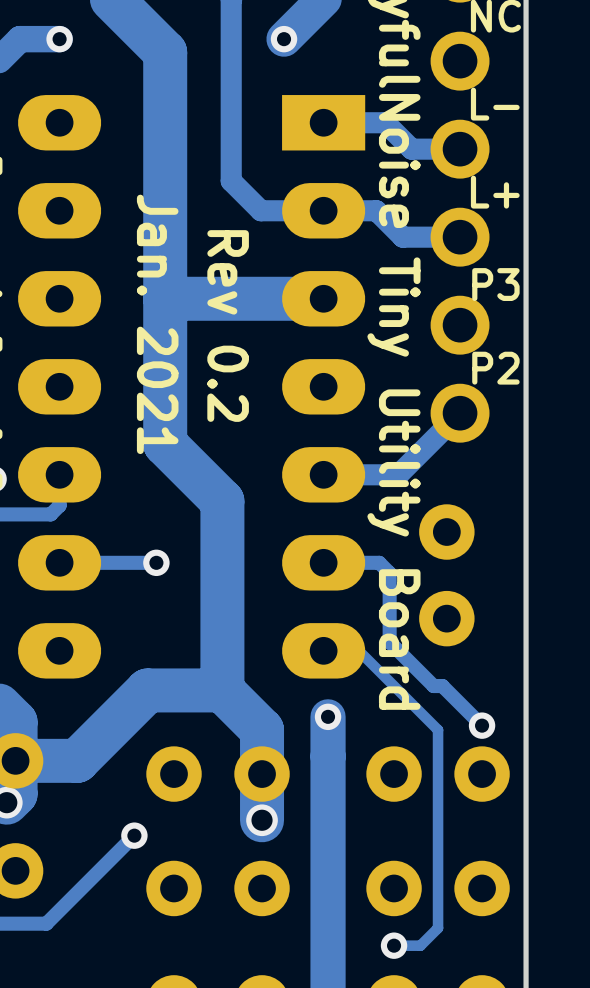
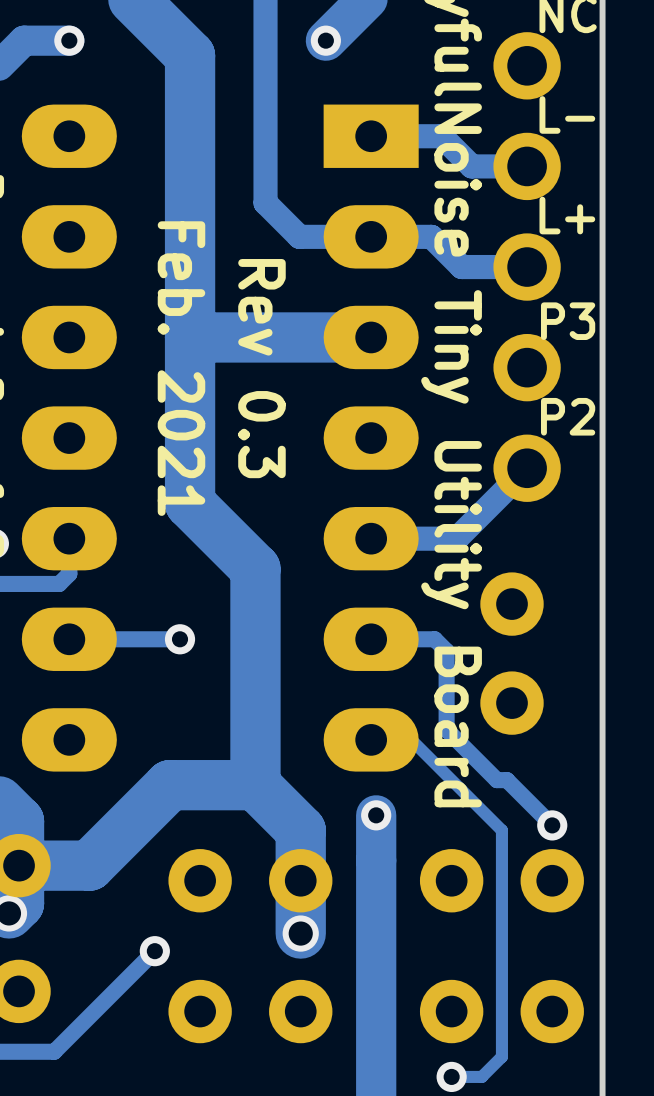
text: Jan. 2021 (157, 324) -> Feb. 2021 (181, 368)
text: Rev 0.2 (228, 326) -> Rev 0.3 (261, 368)

